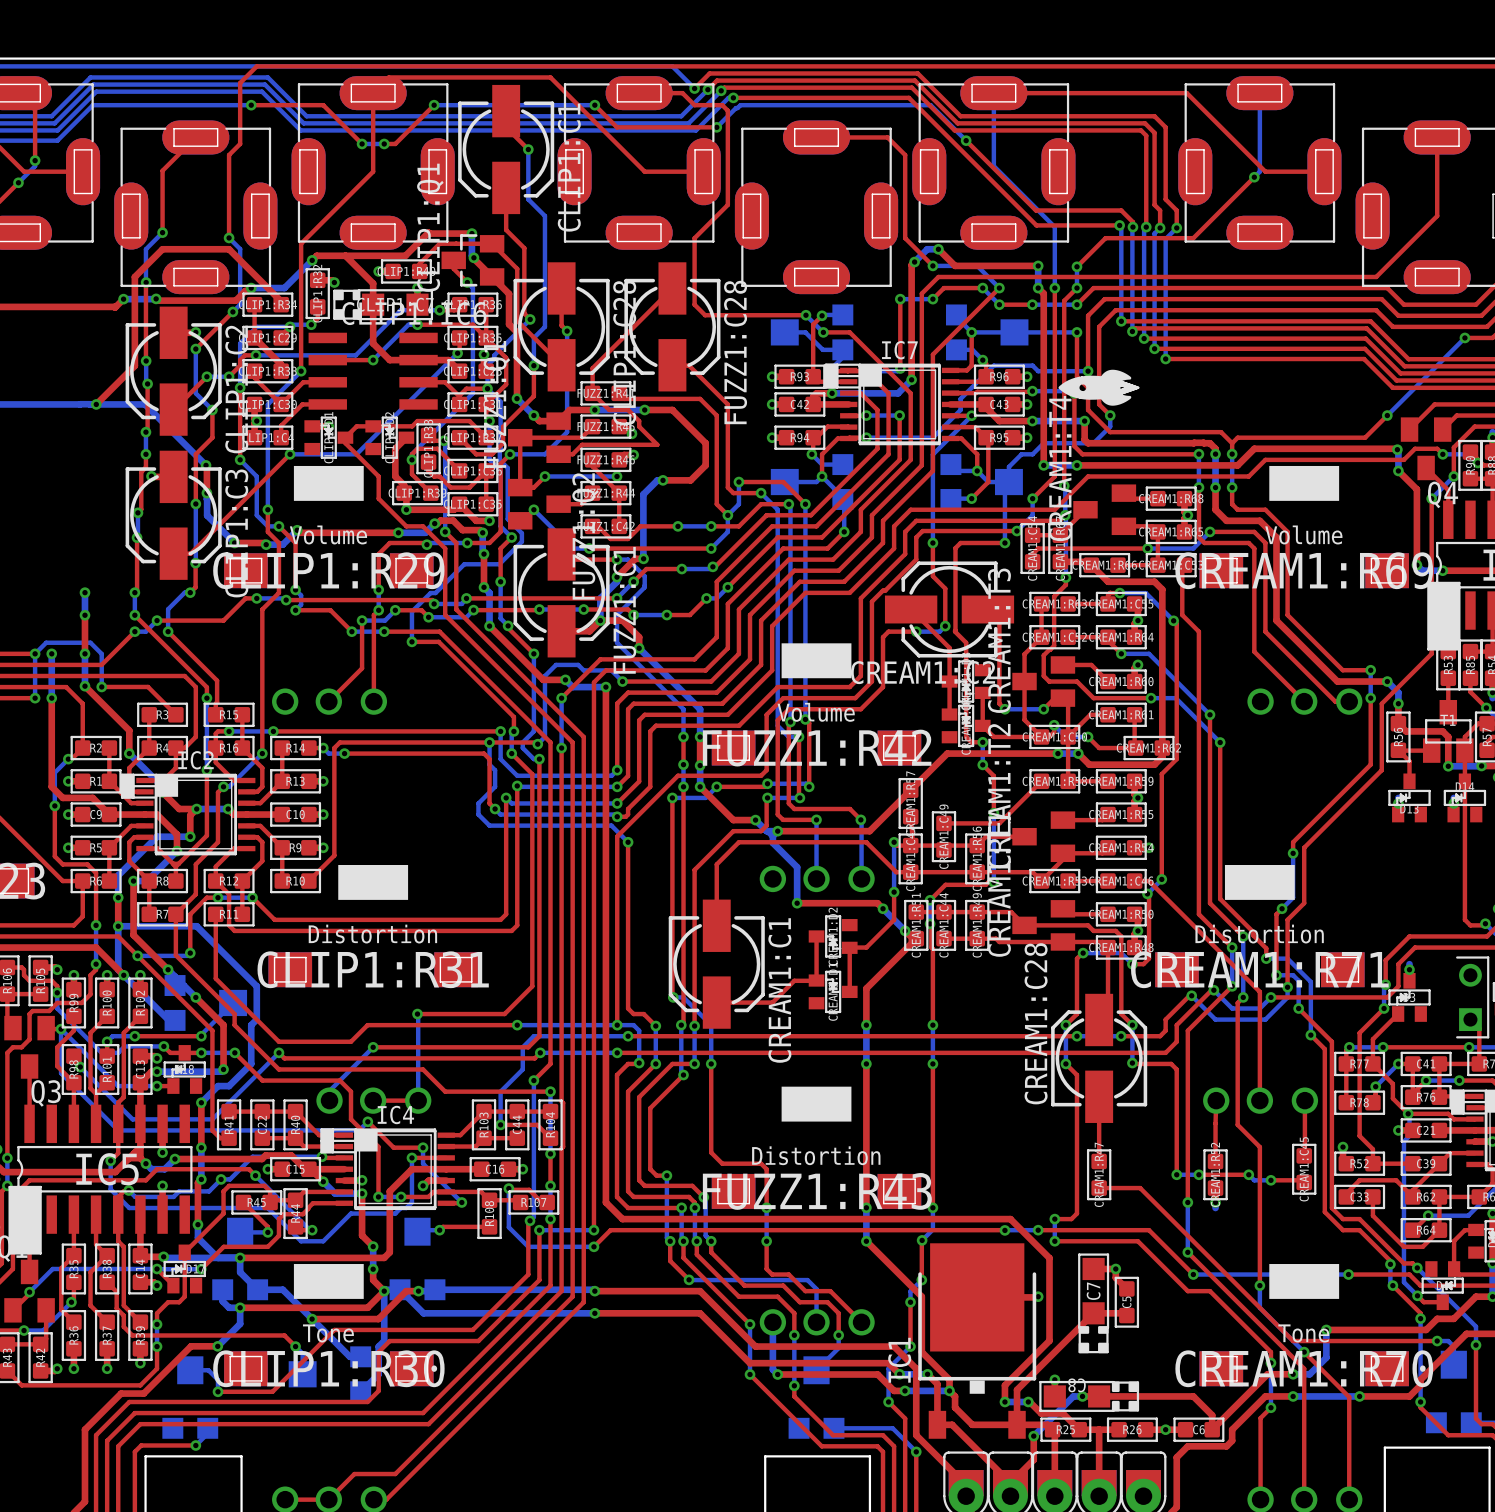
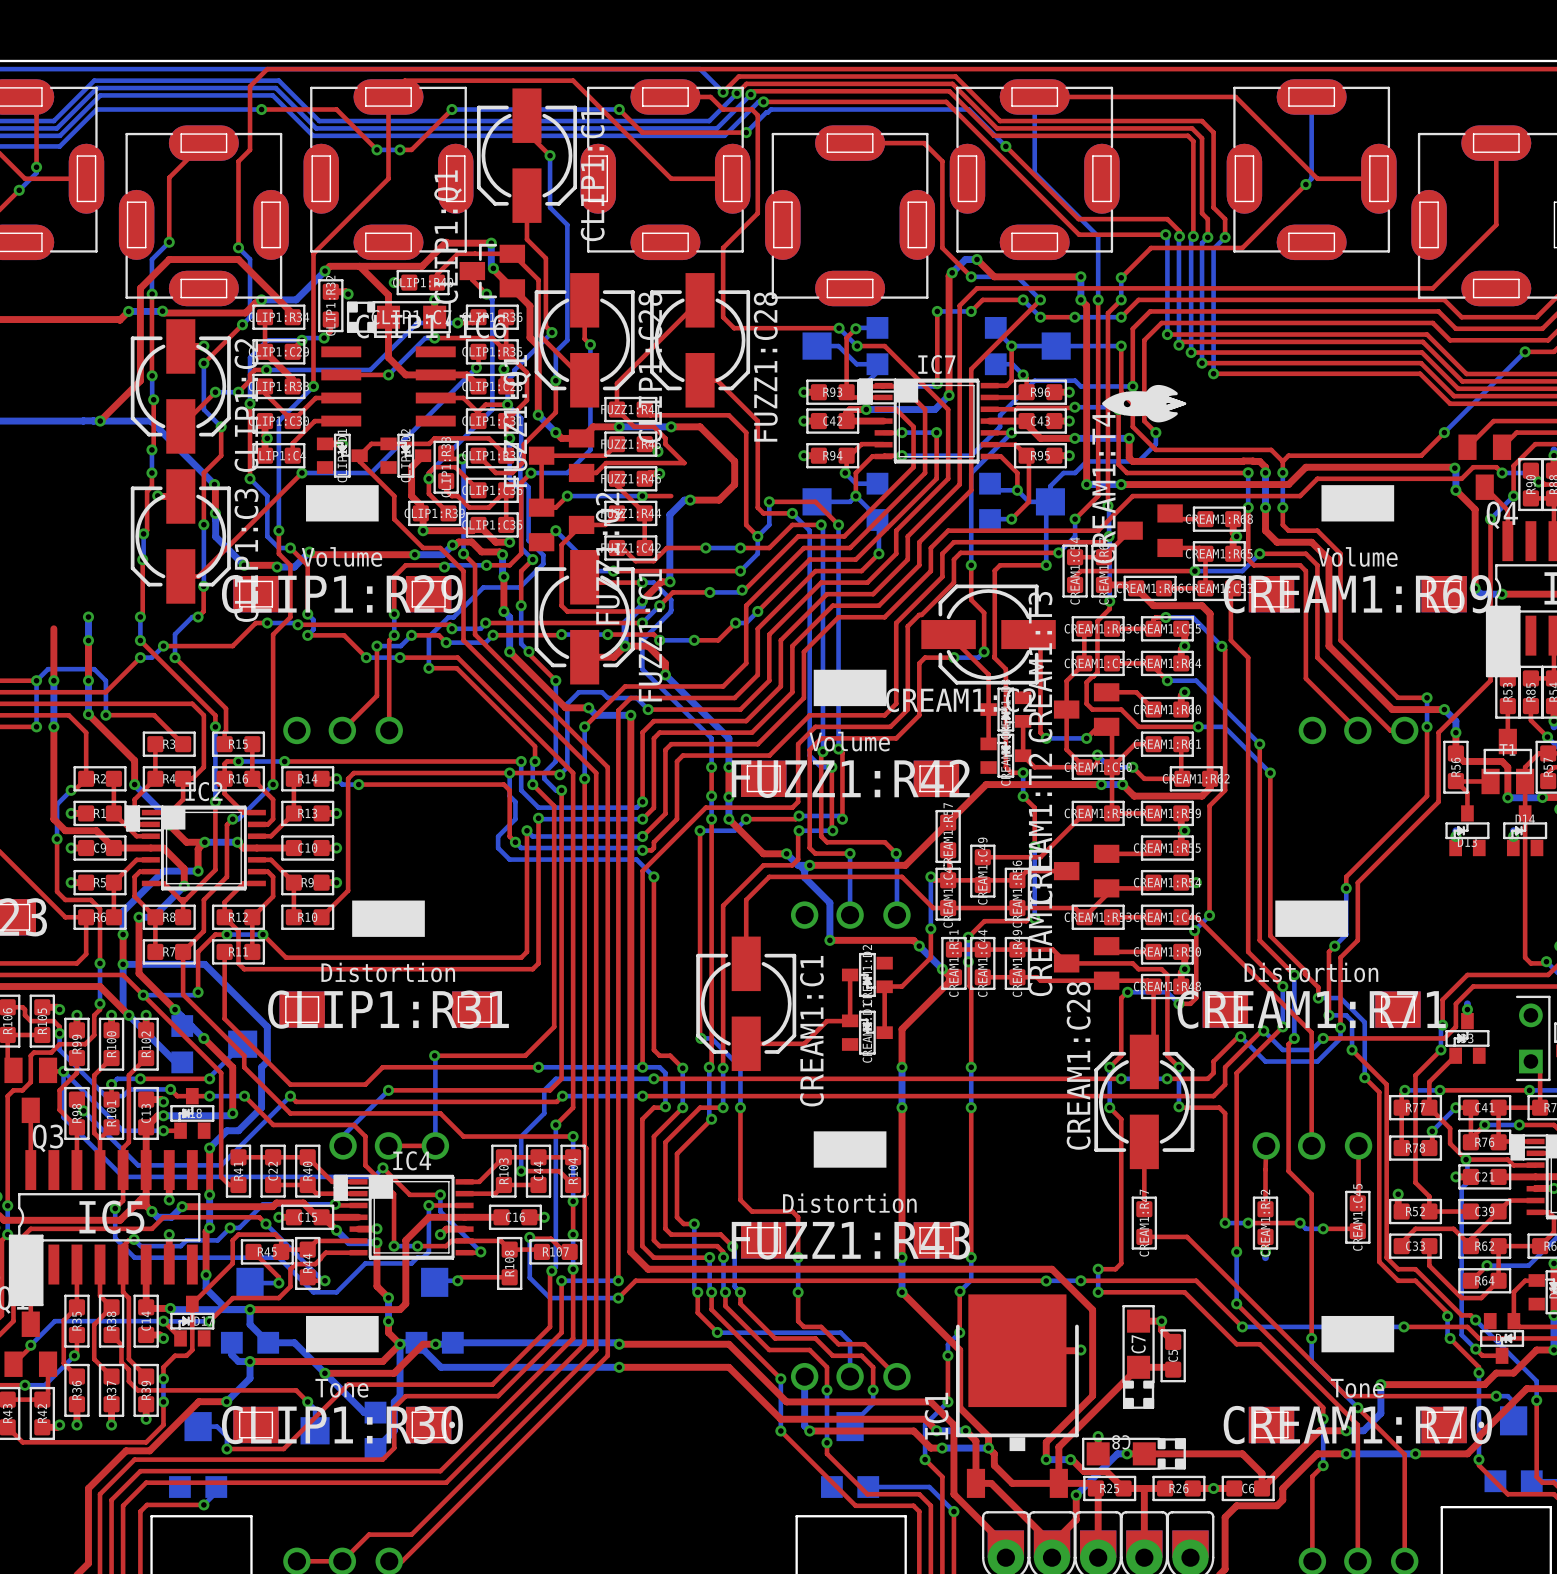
top track: none -> (642, 496) (671, 496)
top track: none -> (581, 524) (561, 544) (561, 605) (567, 611) (648, 611)
top track: none -> (53, 628) (53, 680)

